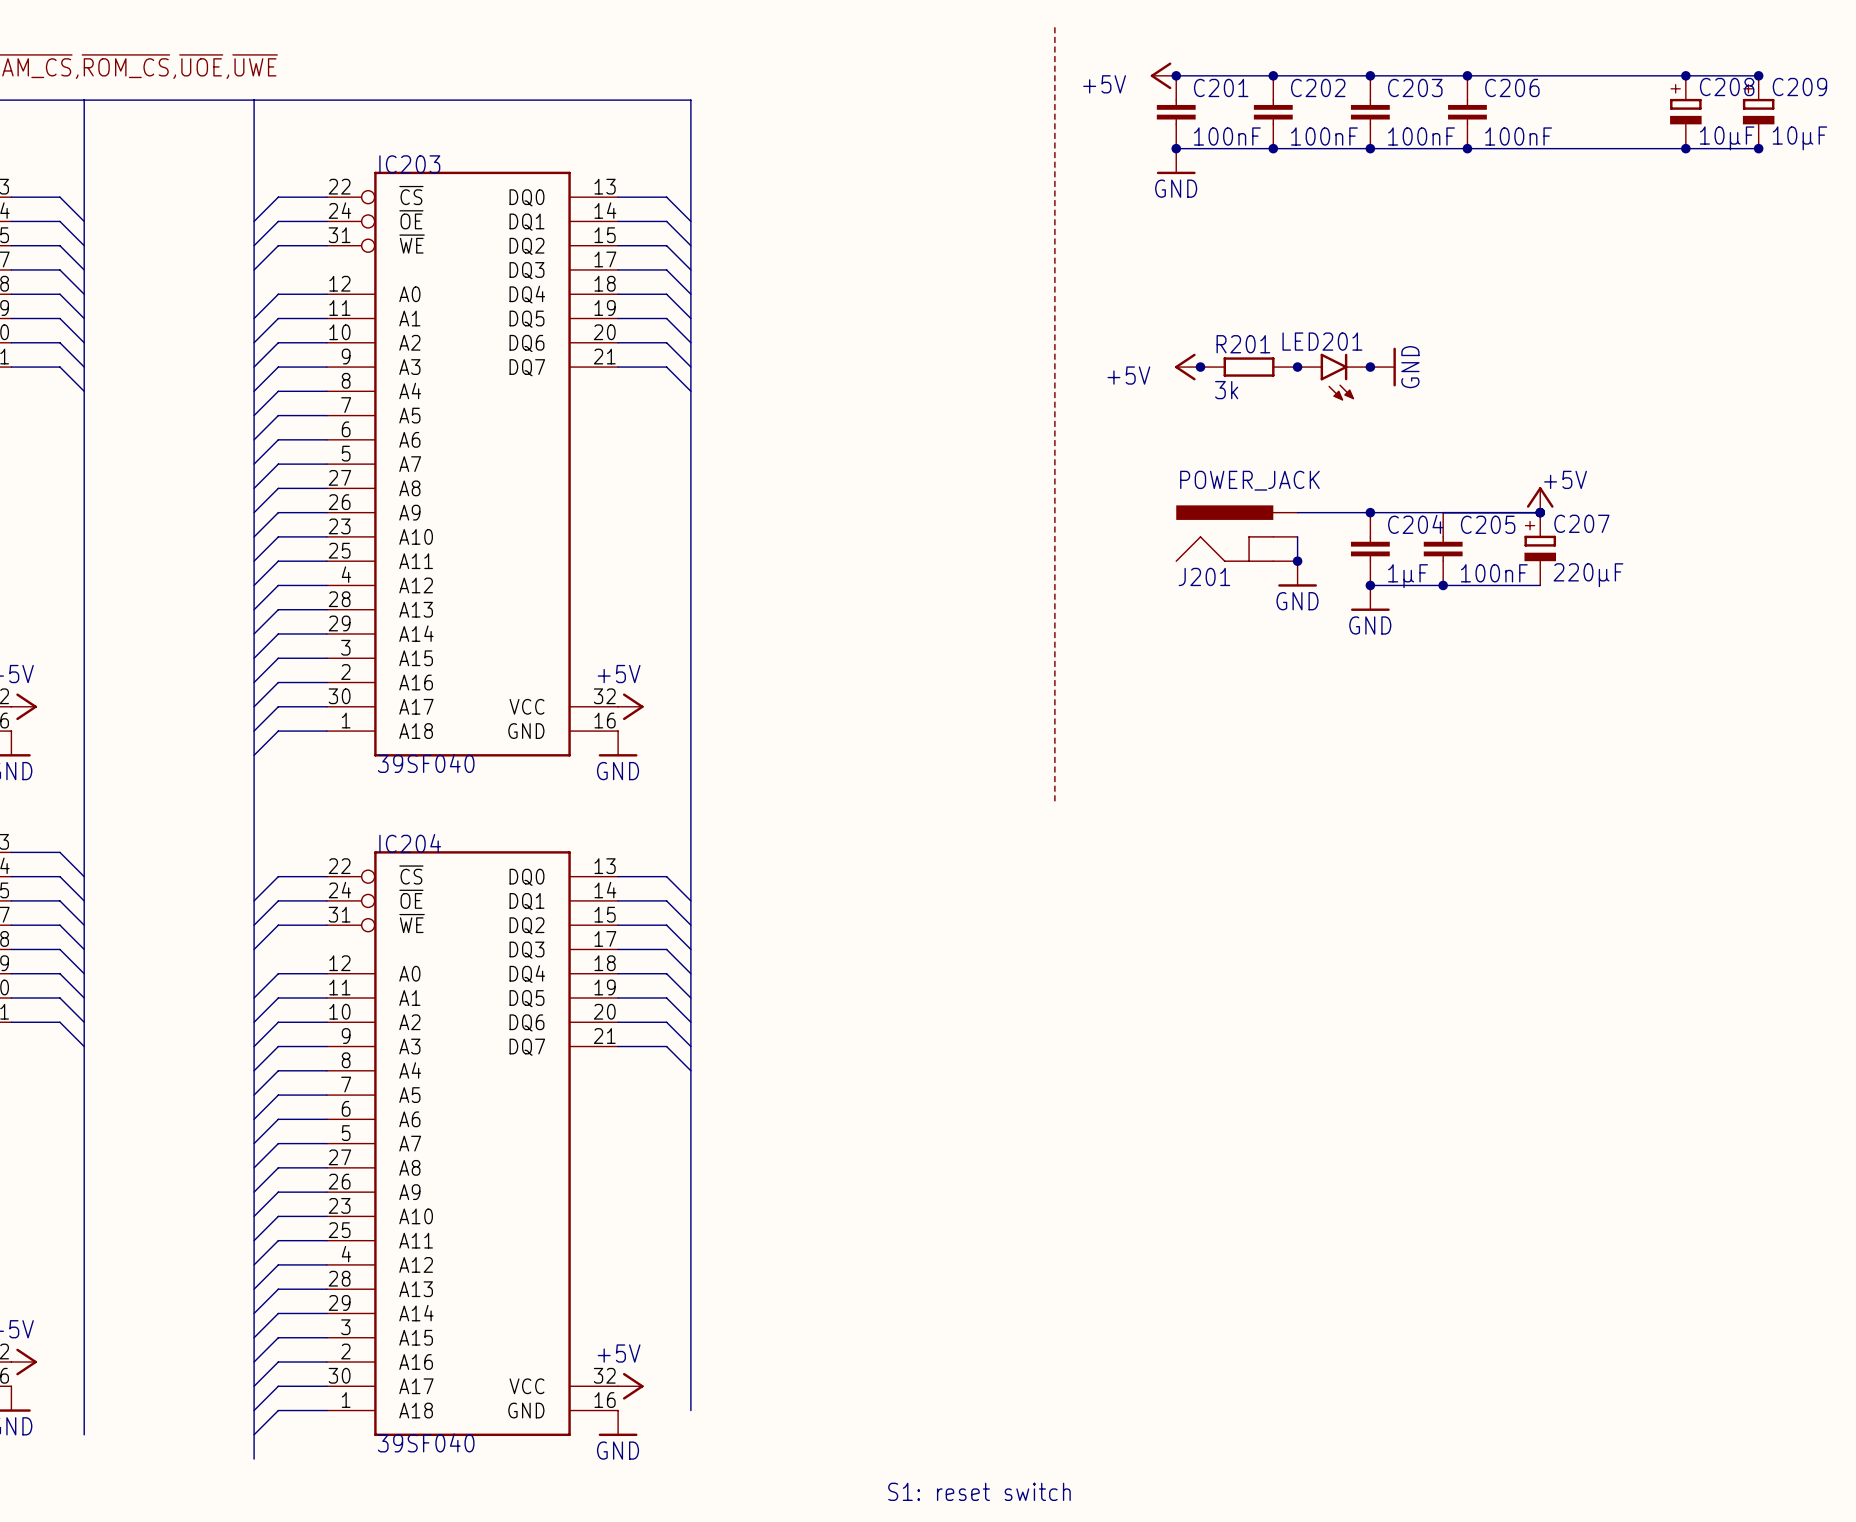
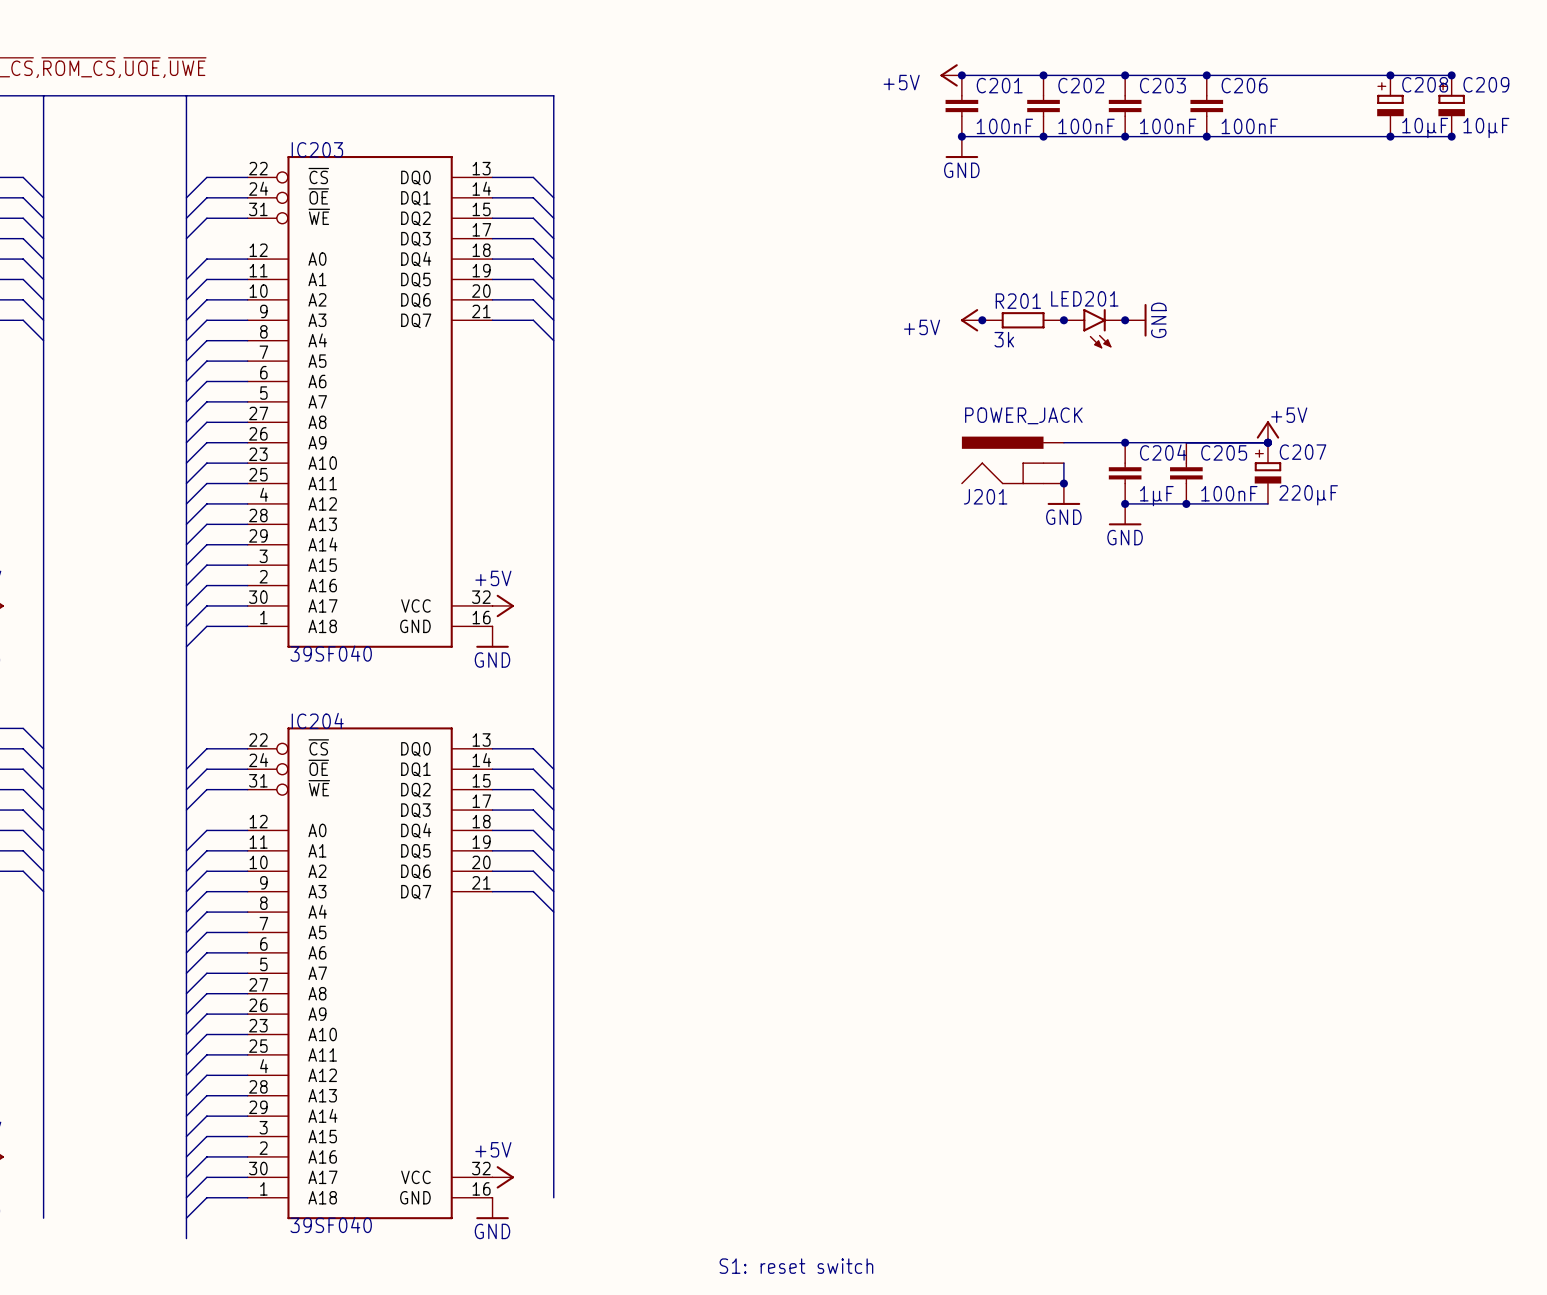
line: (1054, 27) (1054, 803) -> none

